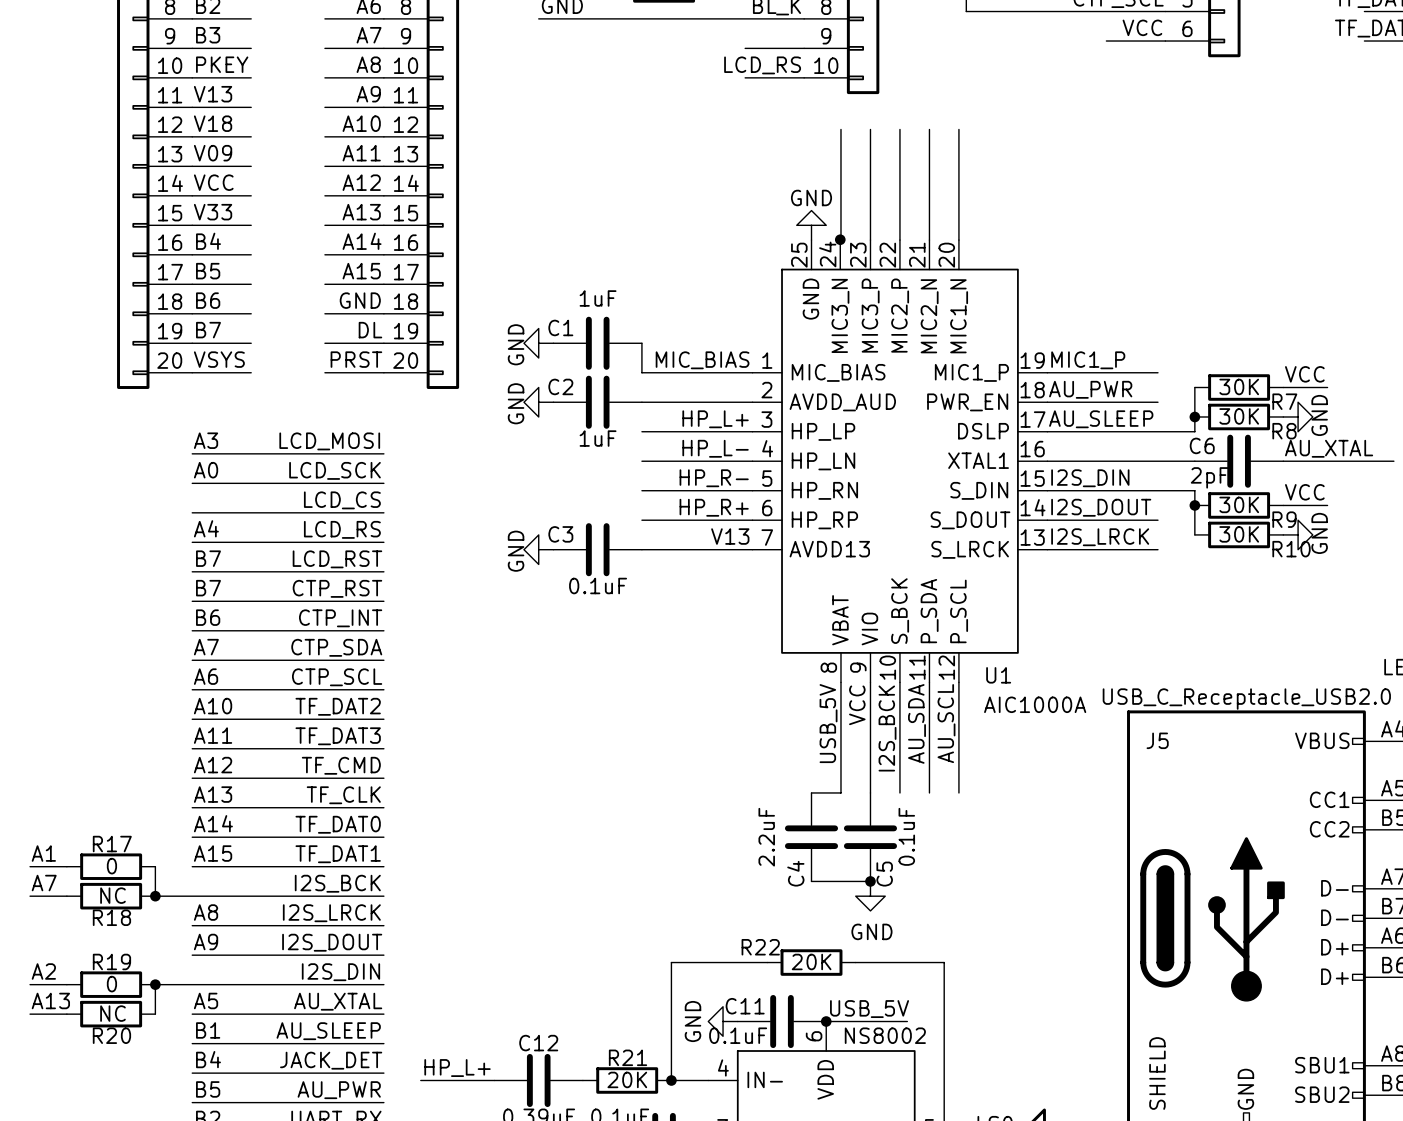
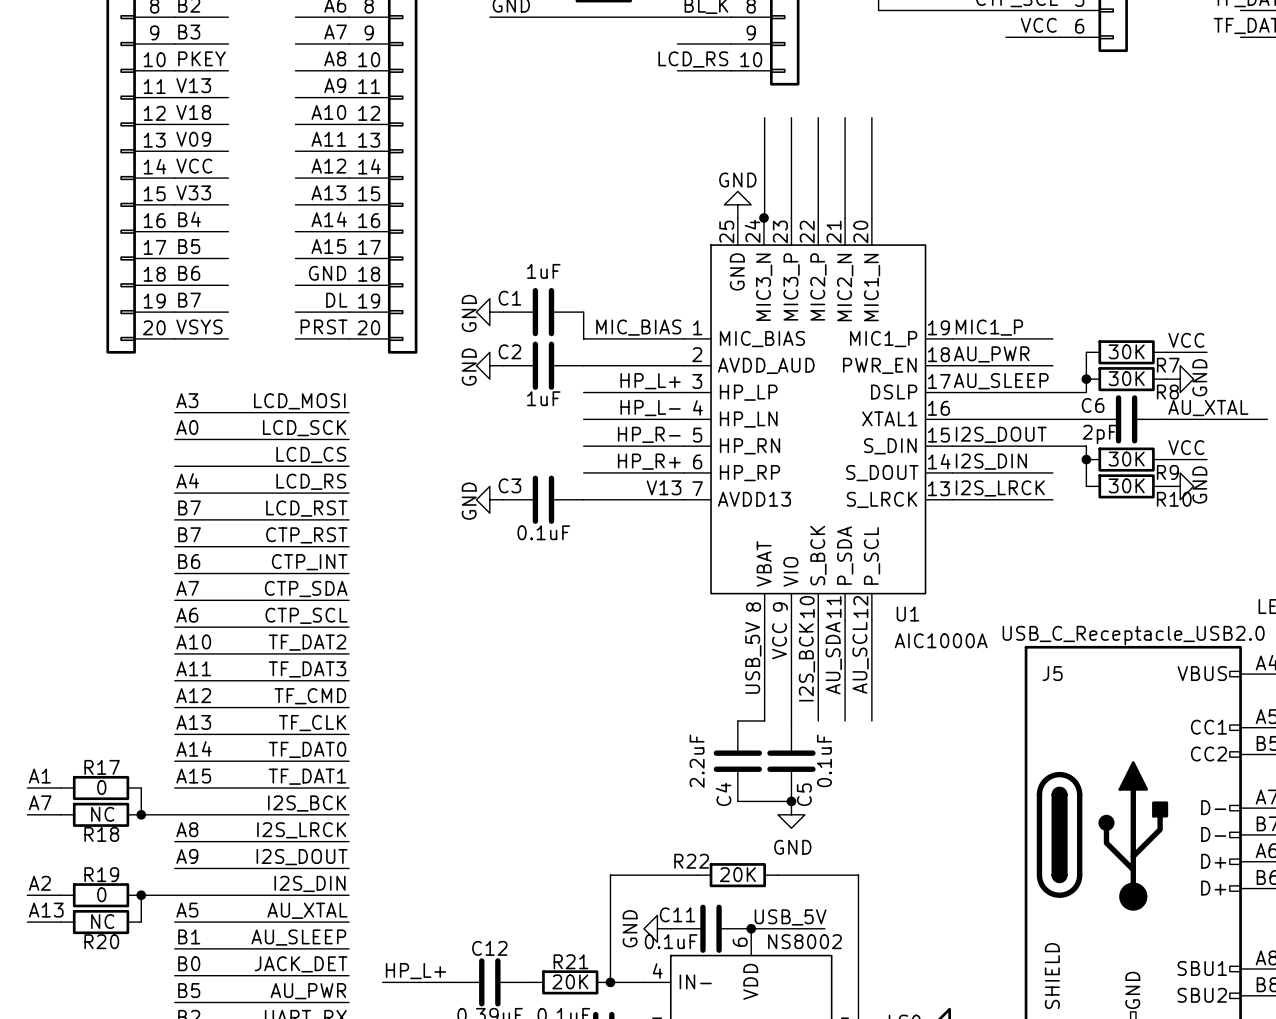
label: I2S_DIN (1090, 478) -> I2S_DOUT (1001, 434)
label: I2S_DOUT (1101, 507) -> I2S_DIN (991, 461)
label: B4 (208, 1059) -> B0 (189, 963)

